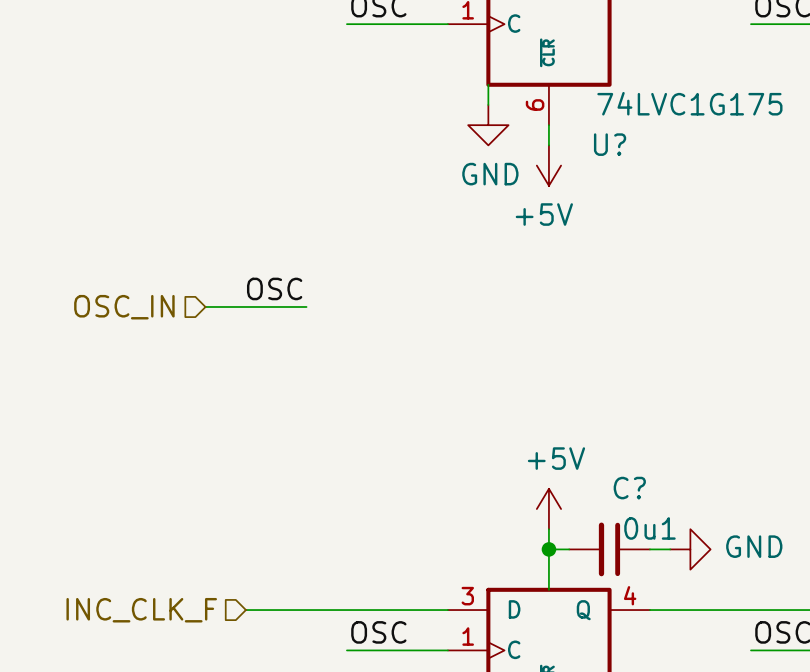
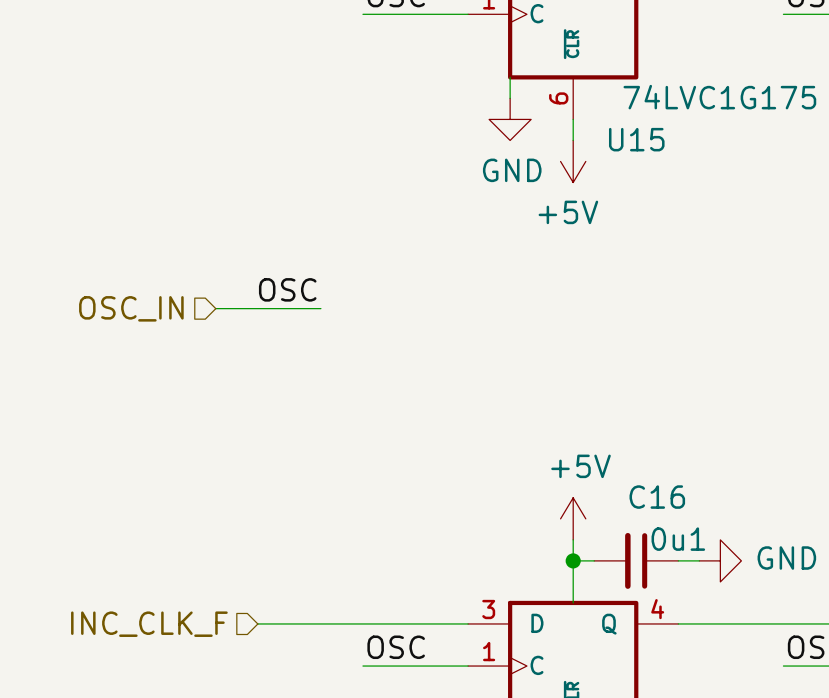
U? name: U? (610, 144) -> U15 (636, 139)
C? name: C? (629, 488) -> C16 (657, 497)

